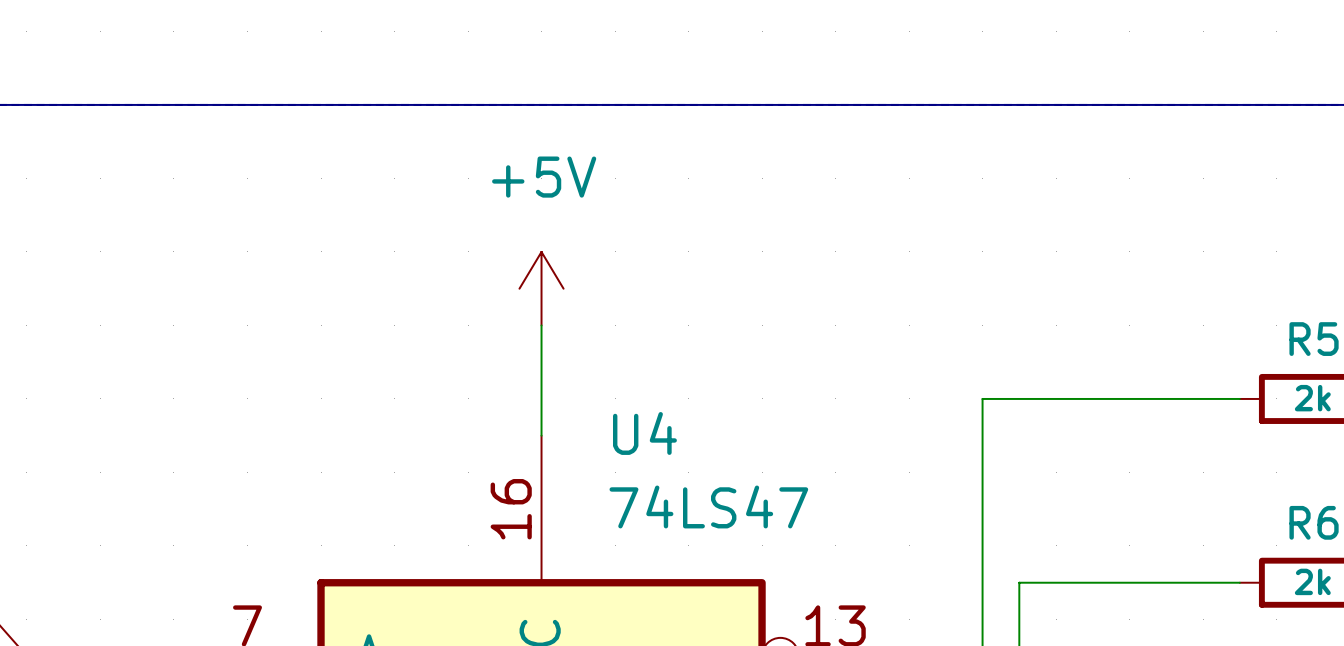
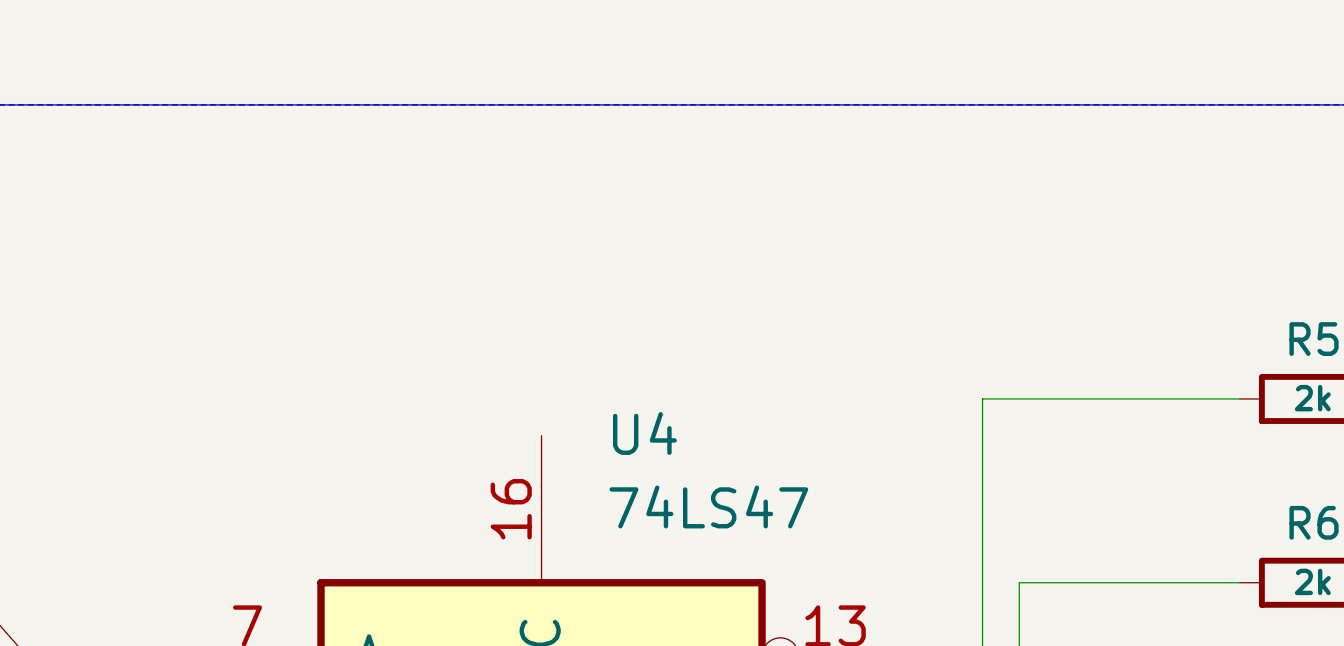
power symbol: +5V (541, 288) -> none
wire: (541, 325) (541, 435) -> none

